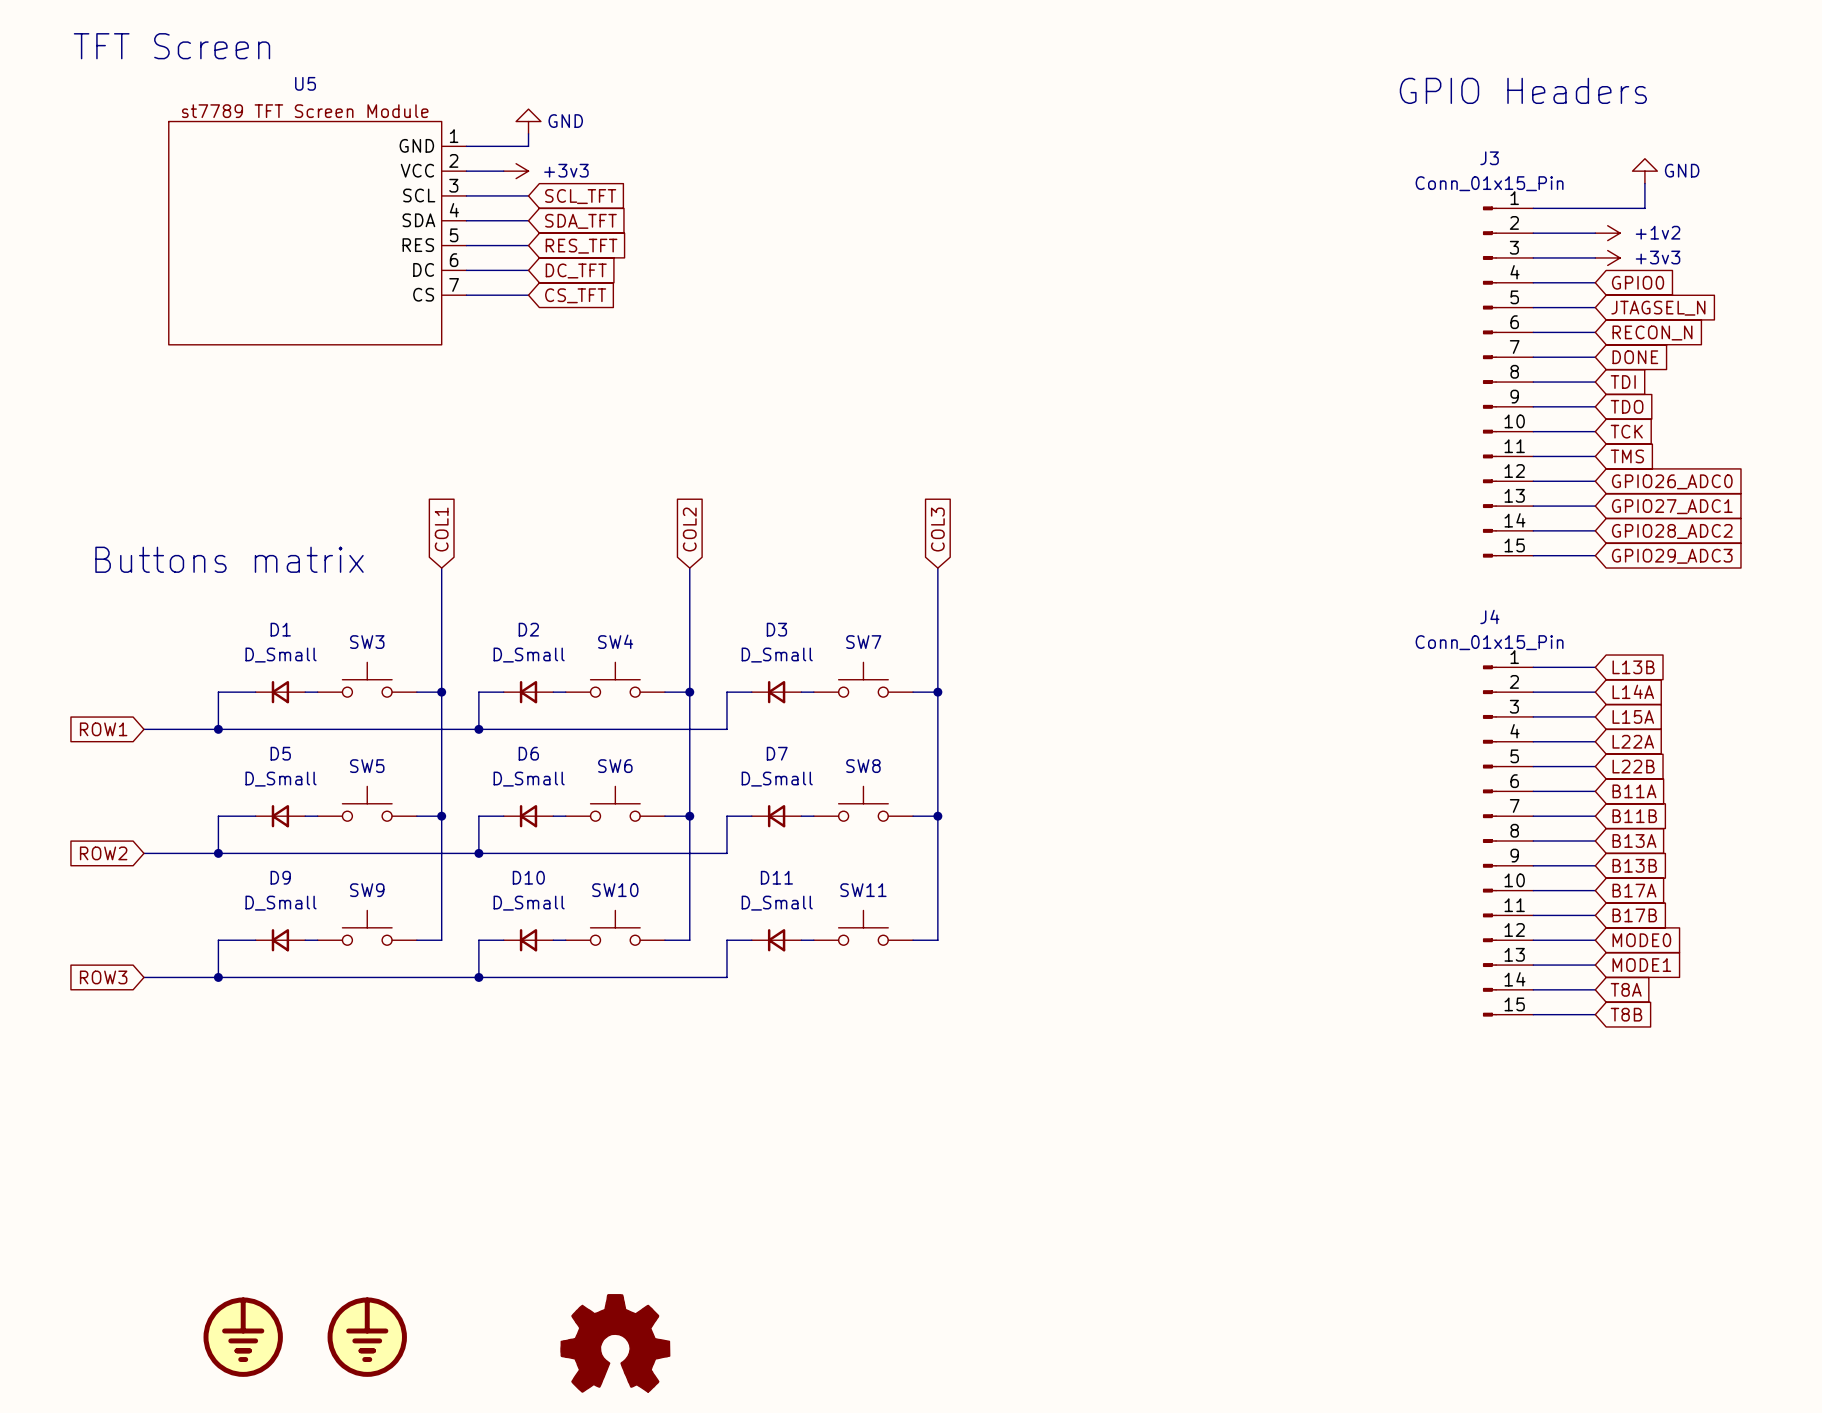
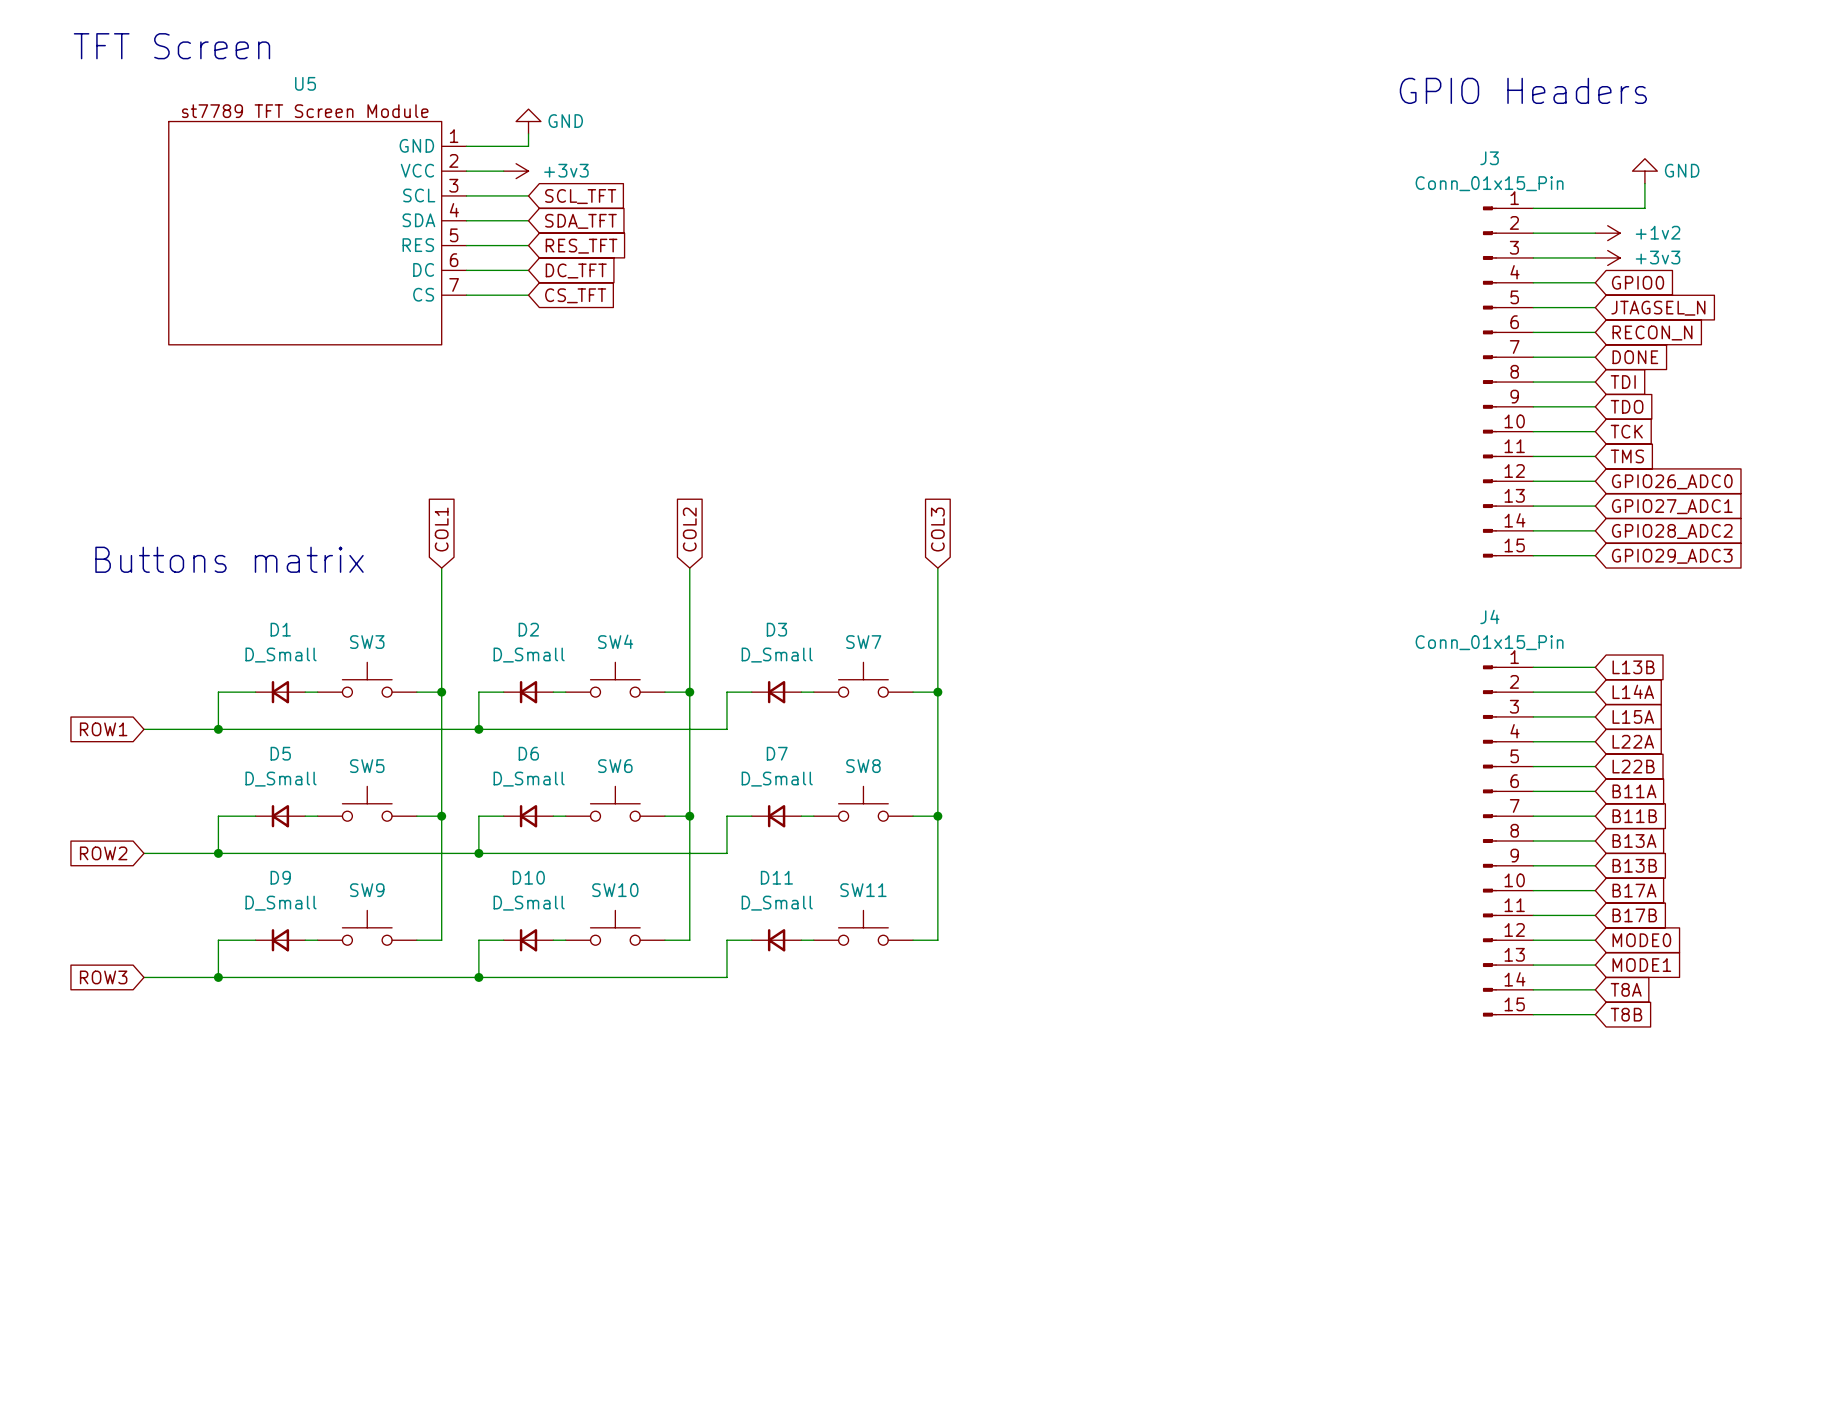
power symbol: (243, 1337) -> none
power symbol: (367, 1337) -> none
power symbol: (615, 1343) -> none

